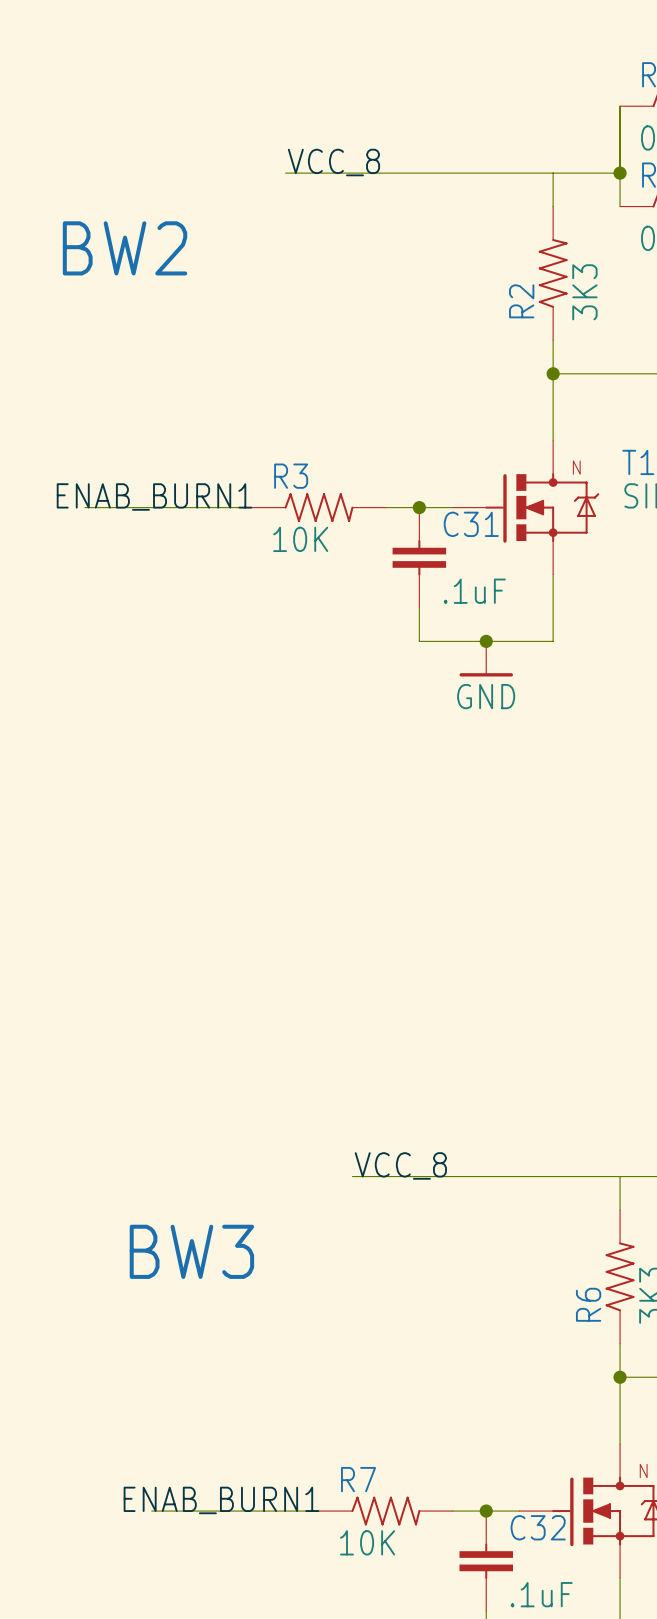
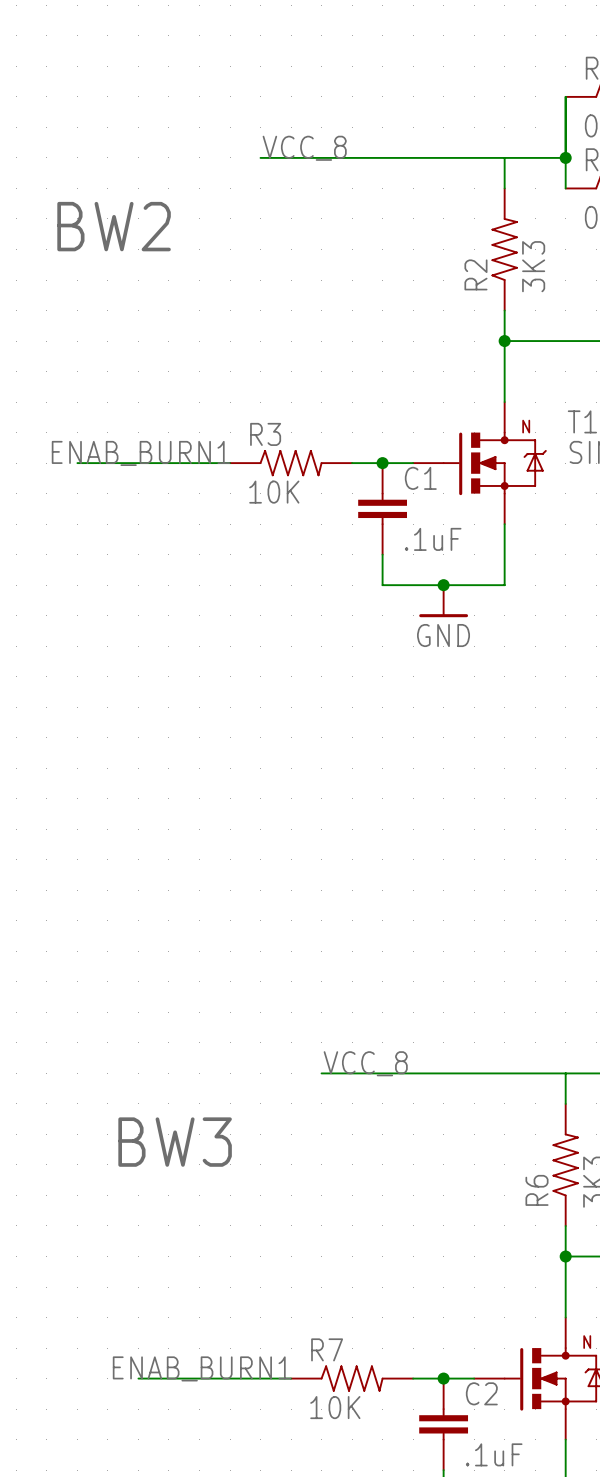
C31 name: C31 (471, 524) -> C1 (420, 478)
C32 name: C32 (538, 1527) -> C2 (481, 1393)

